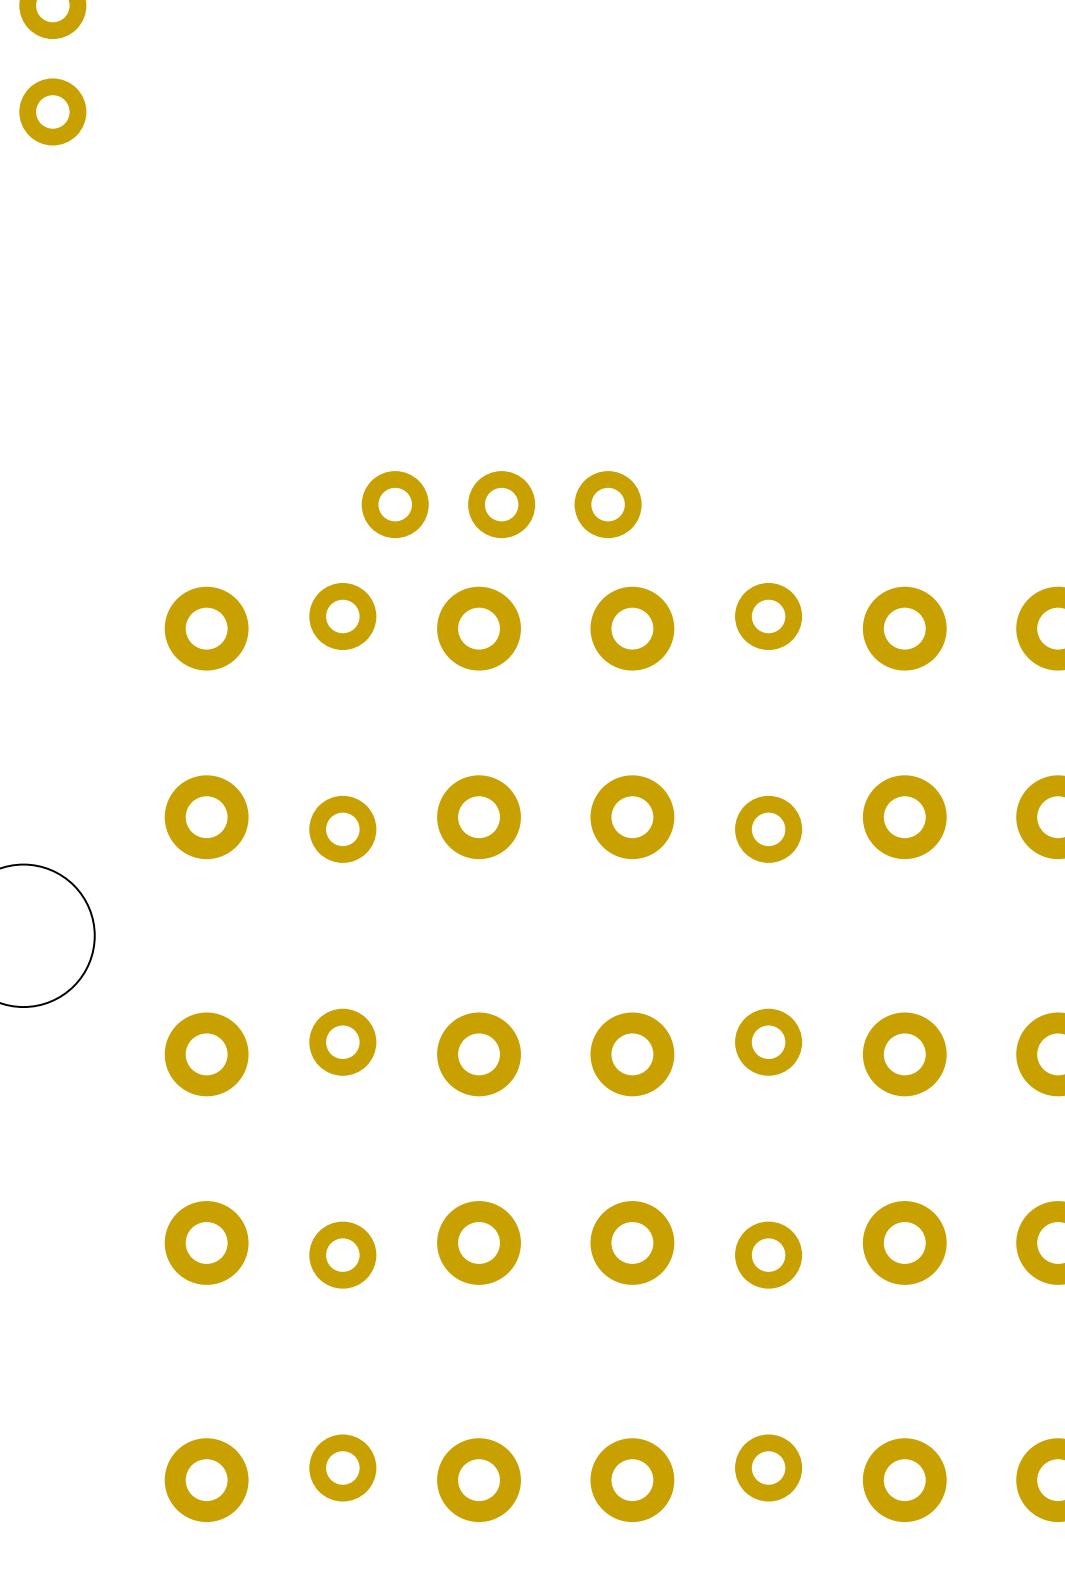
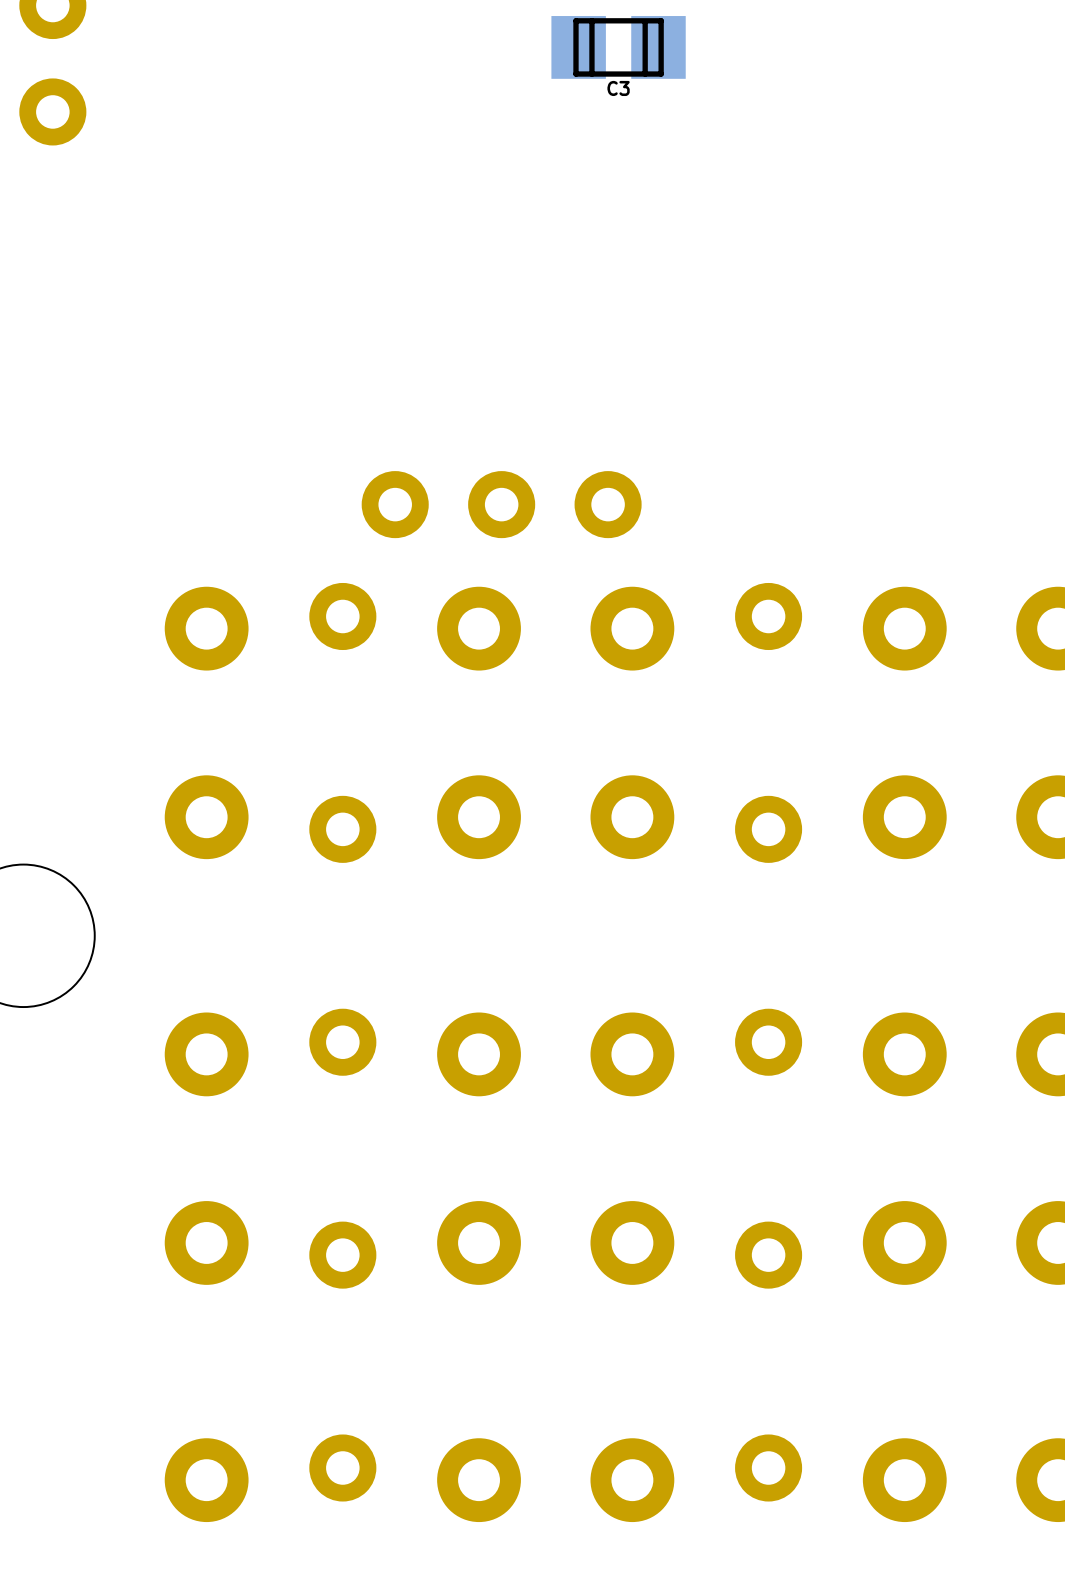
C3: none -> (618, 47)

